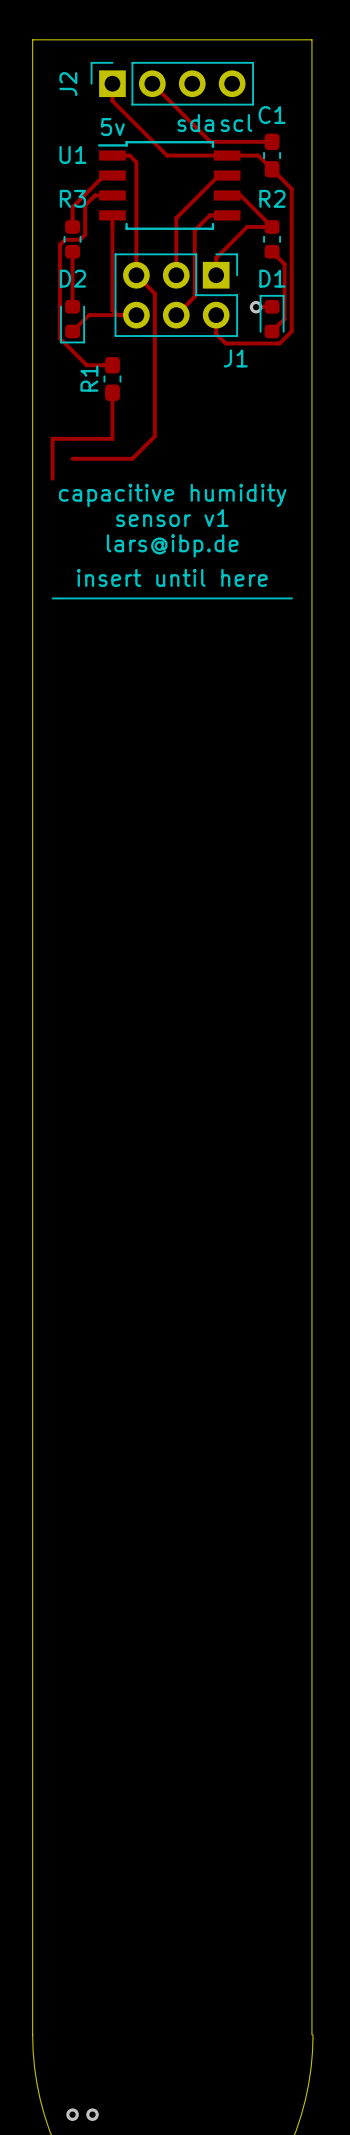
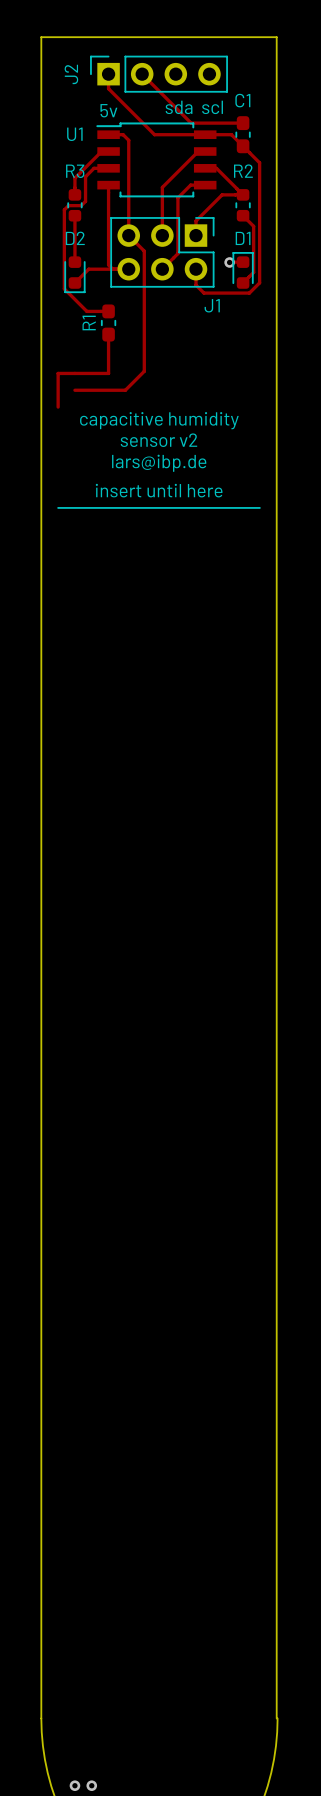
text: sensor v1 (172, 518) -> sensor v2 (158, 440)

